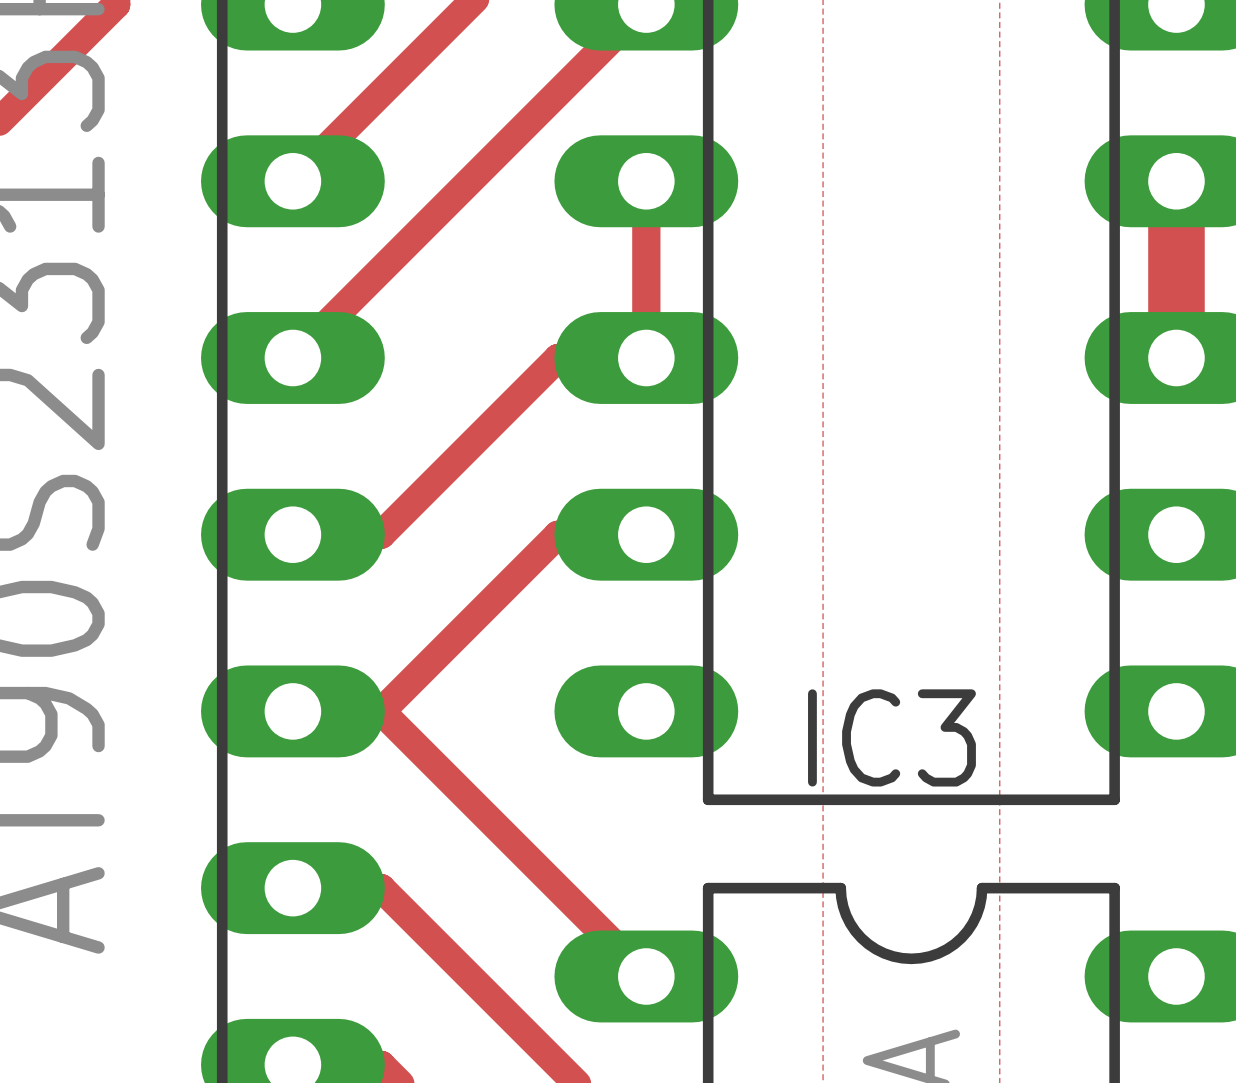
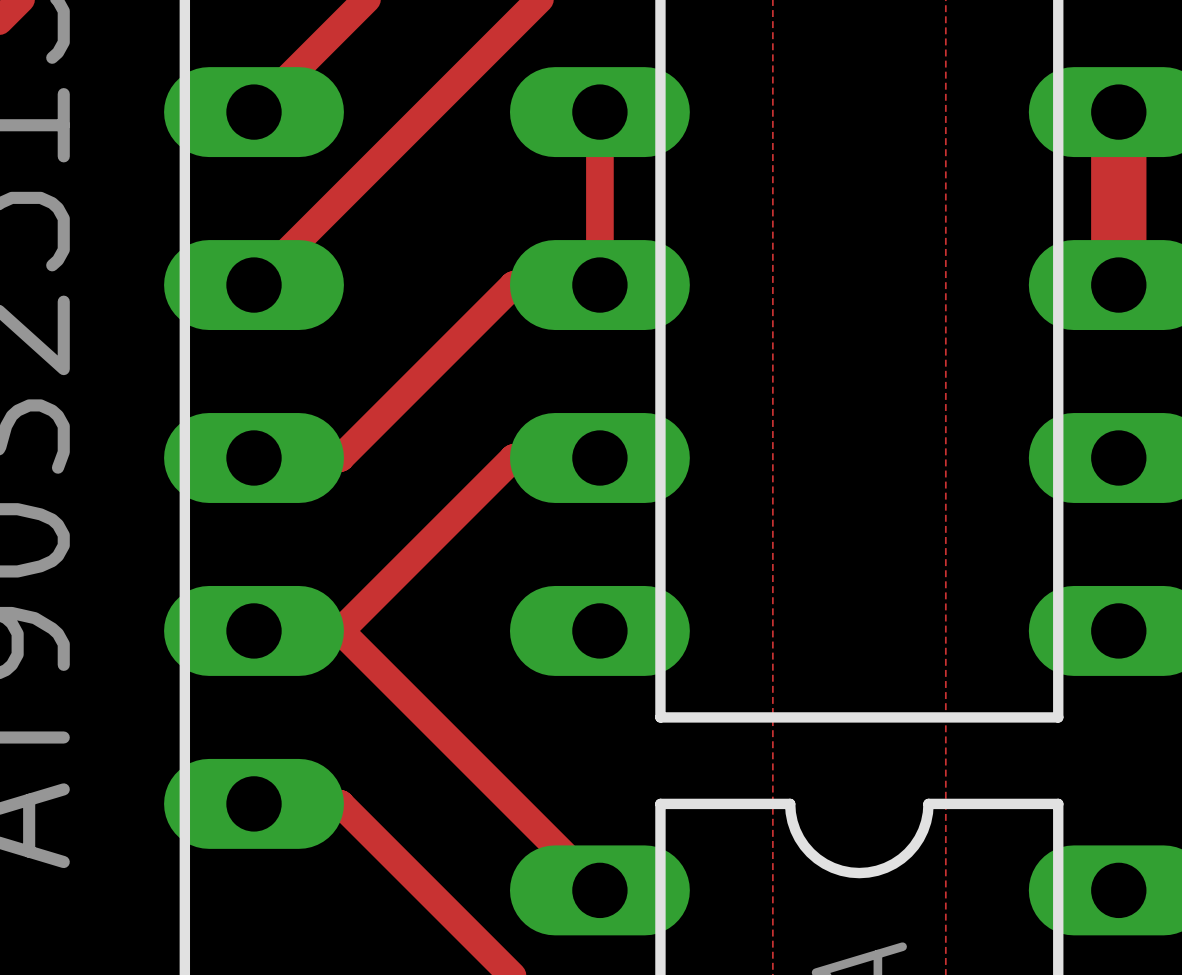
IC3 name: IC3 (891, 737) -> none

